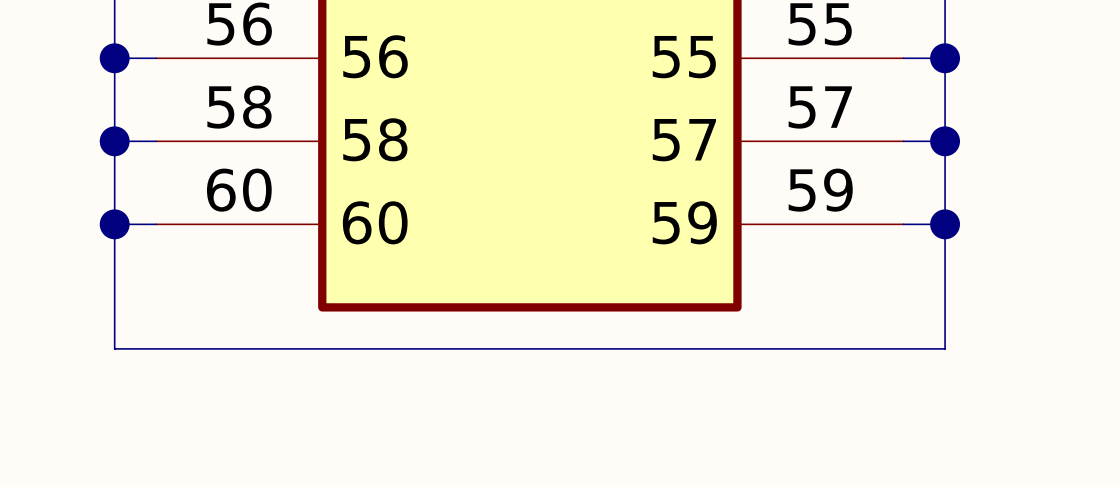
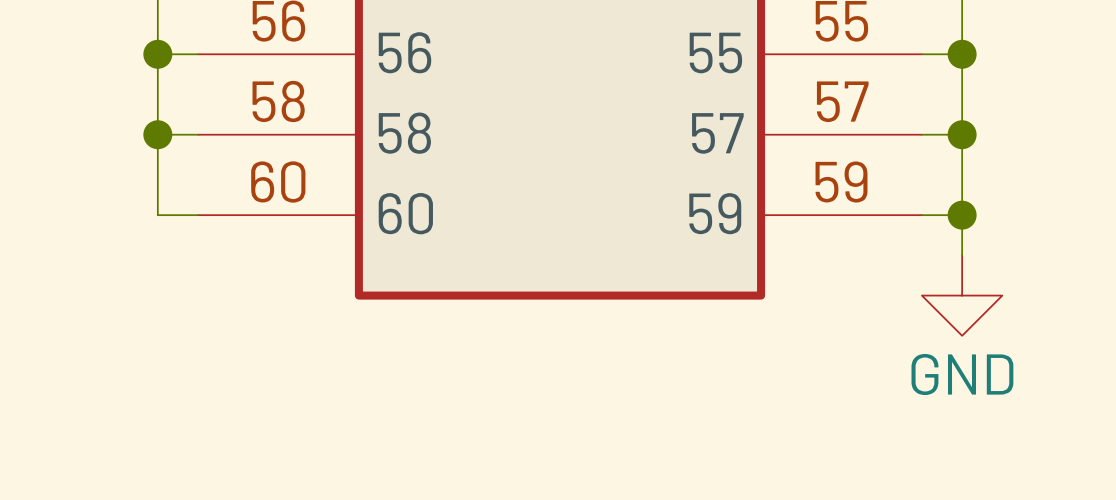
wire: (114, 224) (114, 348) (945, 348) (945, 265) -> none
junction: (114, 224) -> none
power symbol: none -> GND (962, 295)

